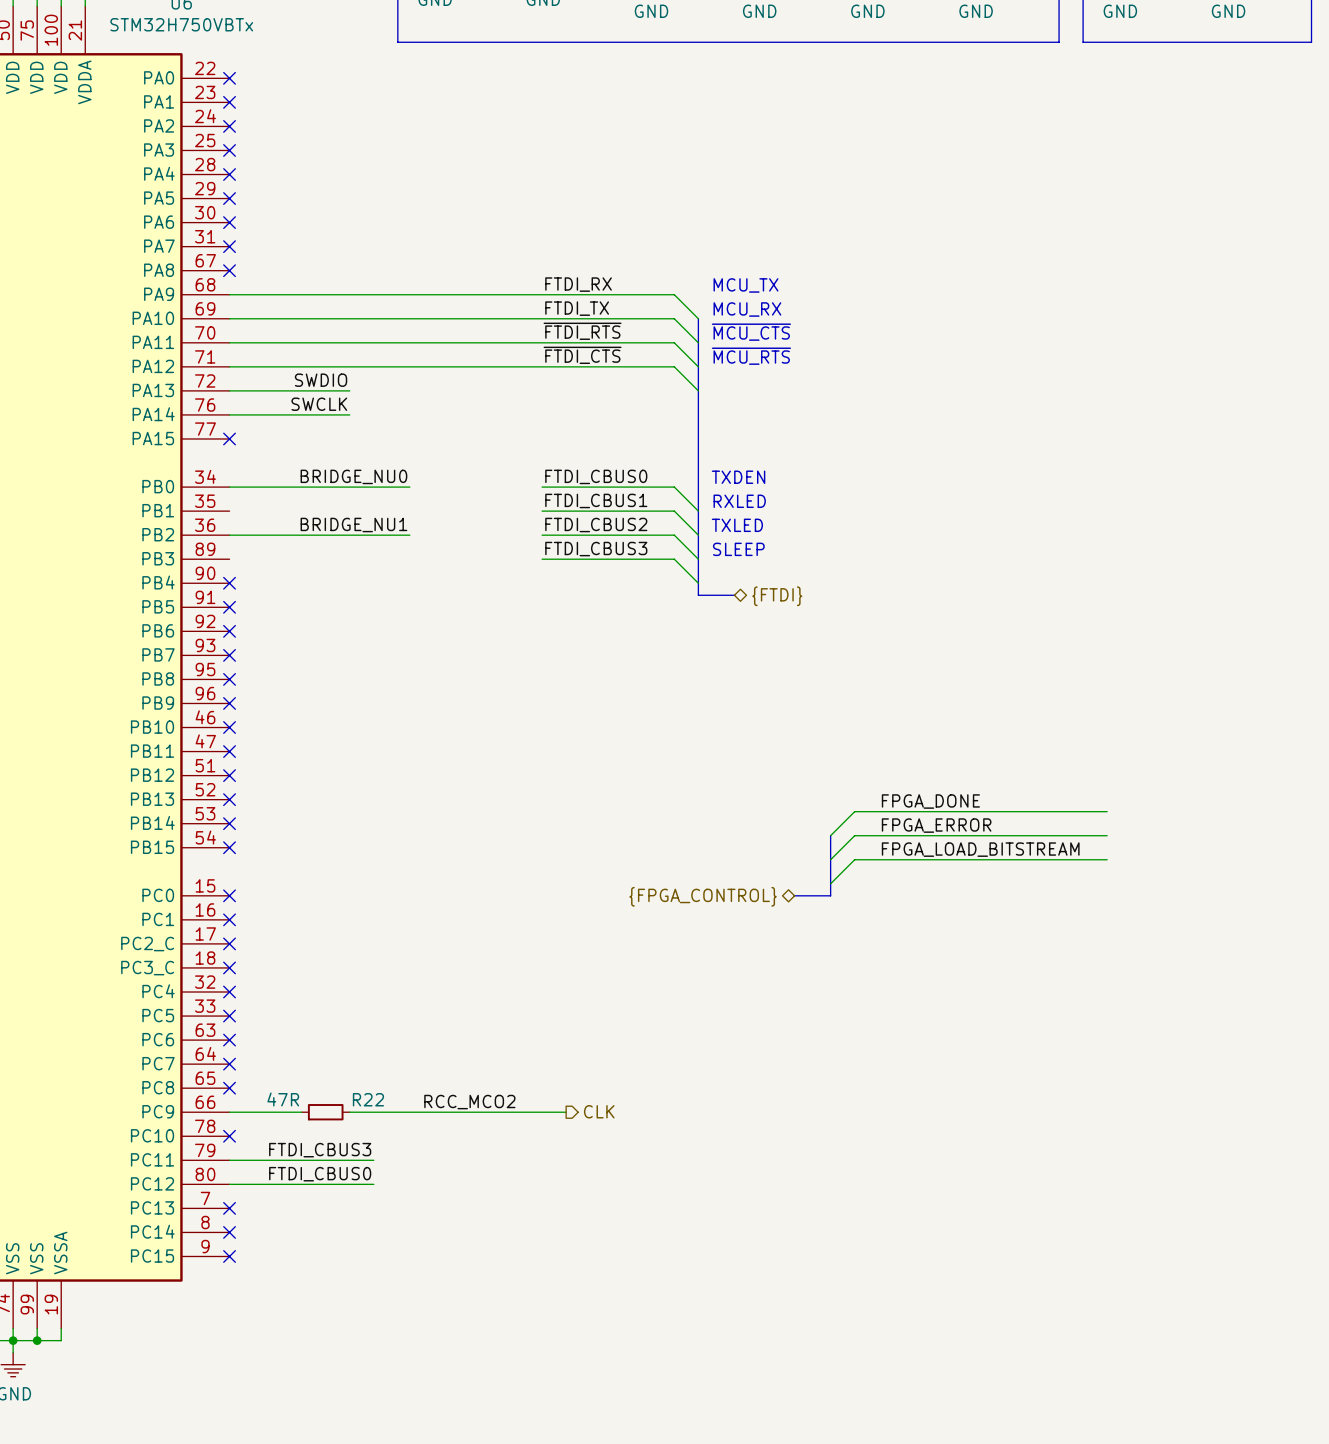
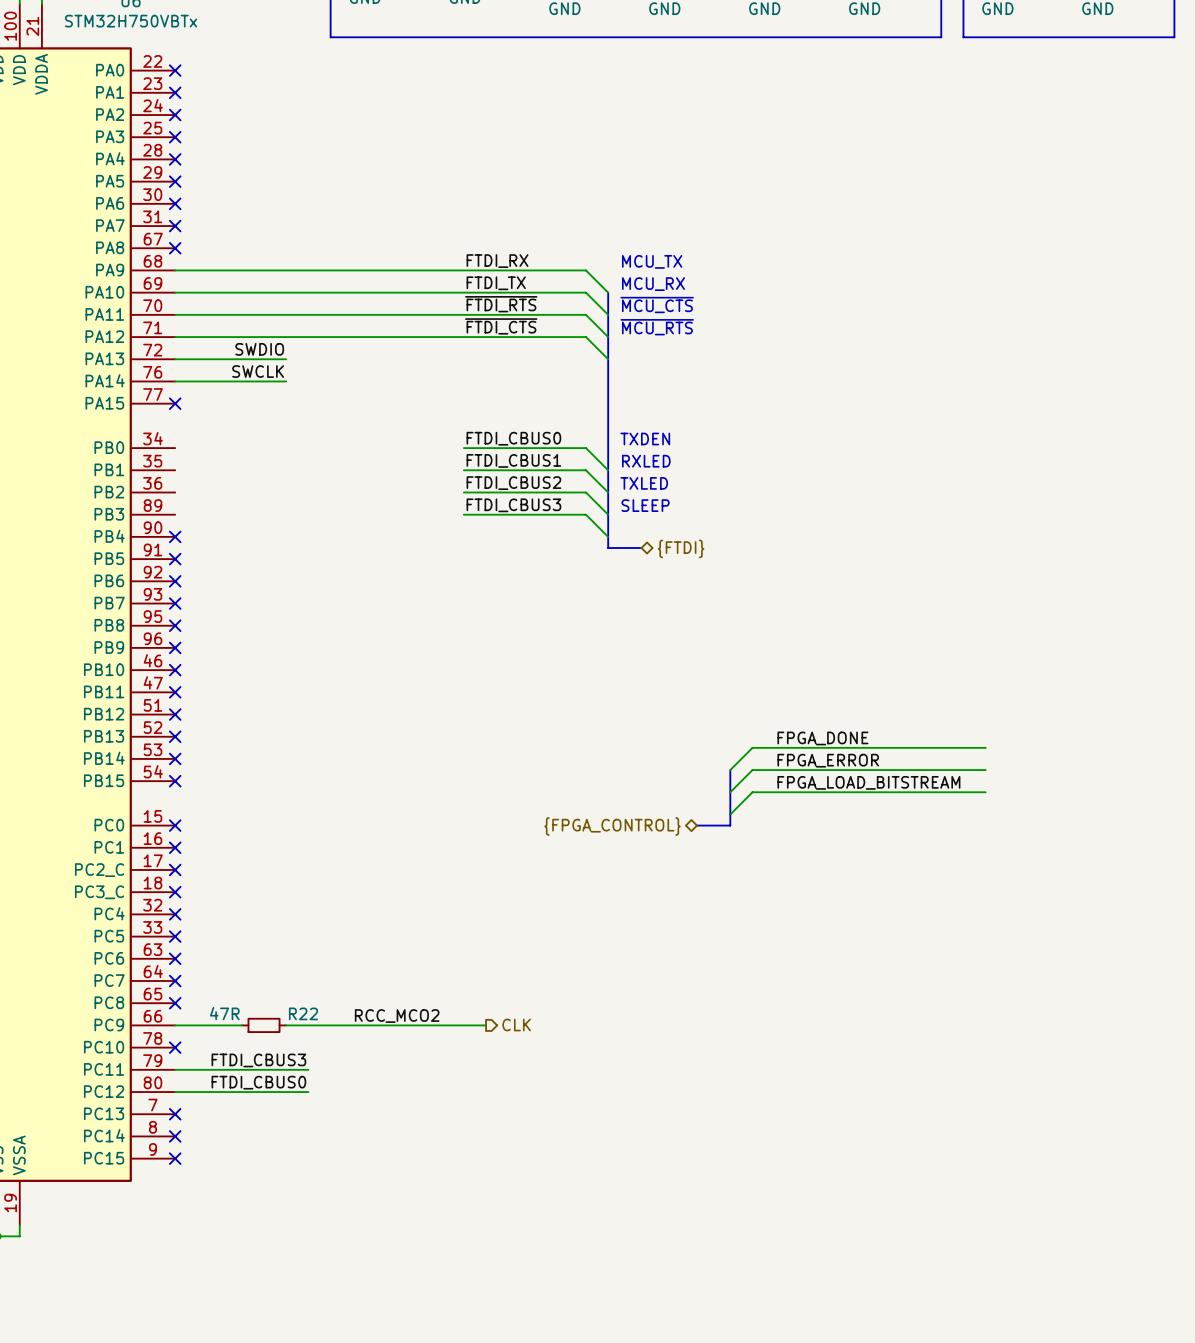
label: BRIDGE_NU0 (353, 476) -> none
wire: (229, 487) (409, 487) -> none
label: BRIDGE_NU1 (353, 525) -> none
wire: (229, 535) (409, 535) -> none

